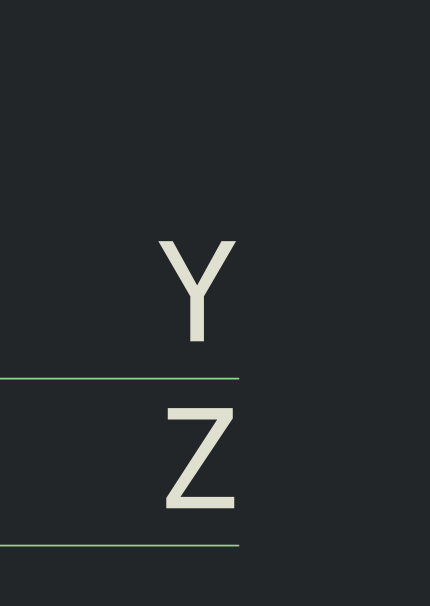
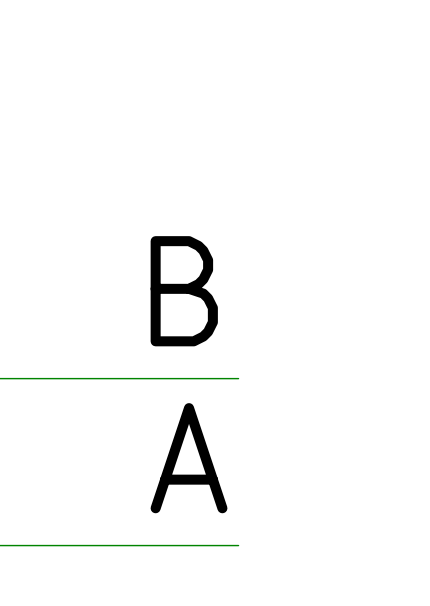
label: Y (197, 291) -> B (184, 291)
label: Z (200, 458) -> A (189, 458)

